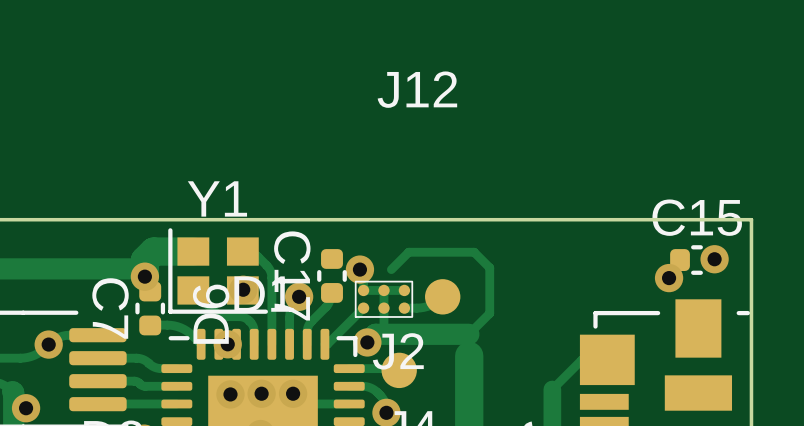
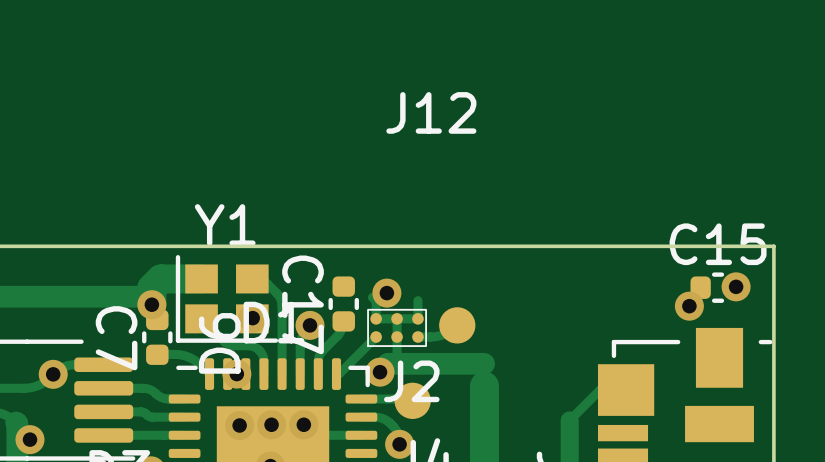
via position: (359, 269) -> (386, 293)
track: (391, 269) (408, 252) (474, 252) (489, 267) (489, 313) (468, 334) -> none
track: none -> (417, 300) (417, 318)

